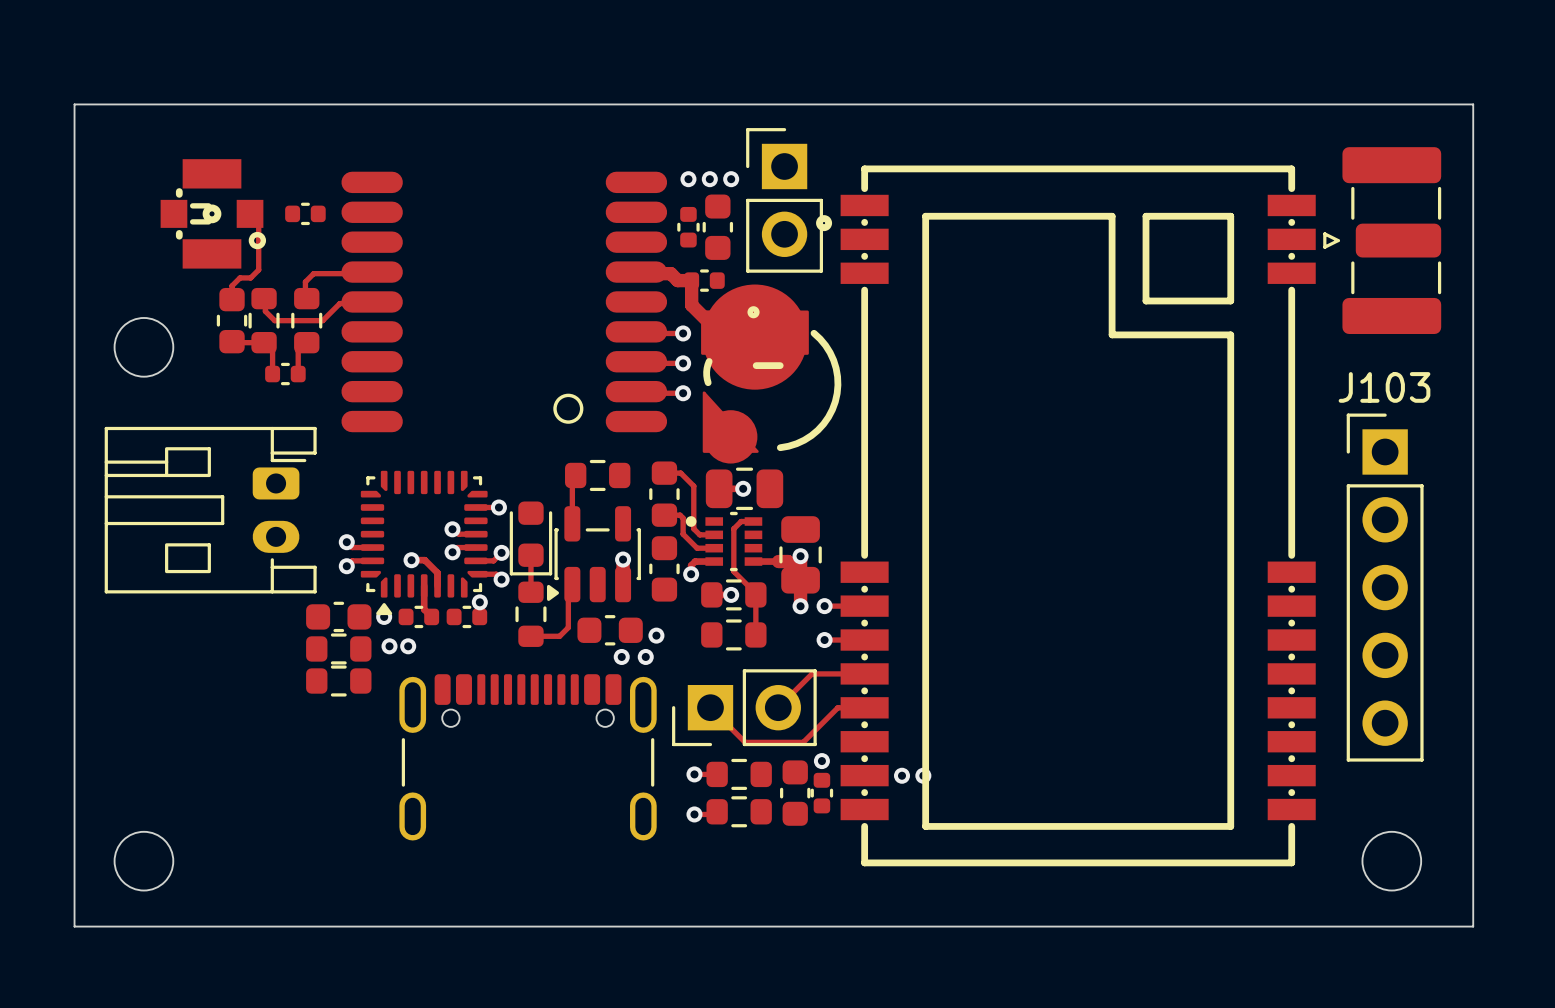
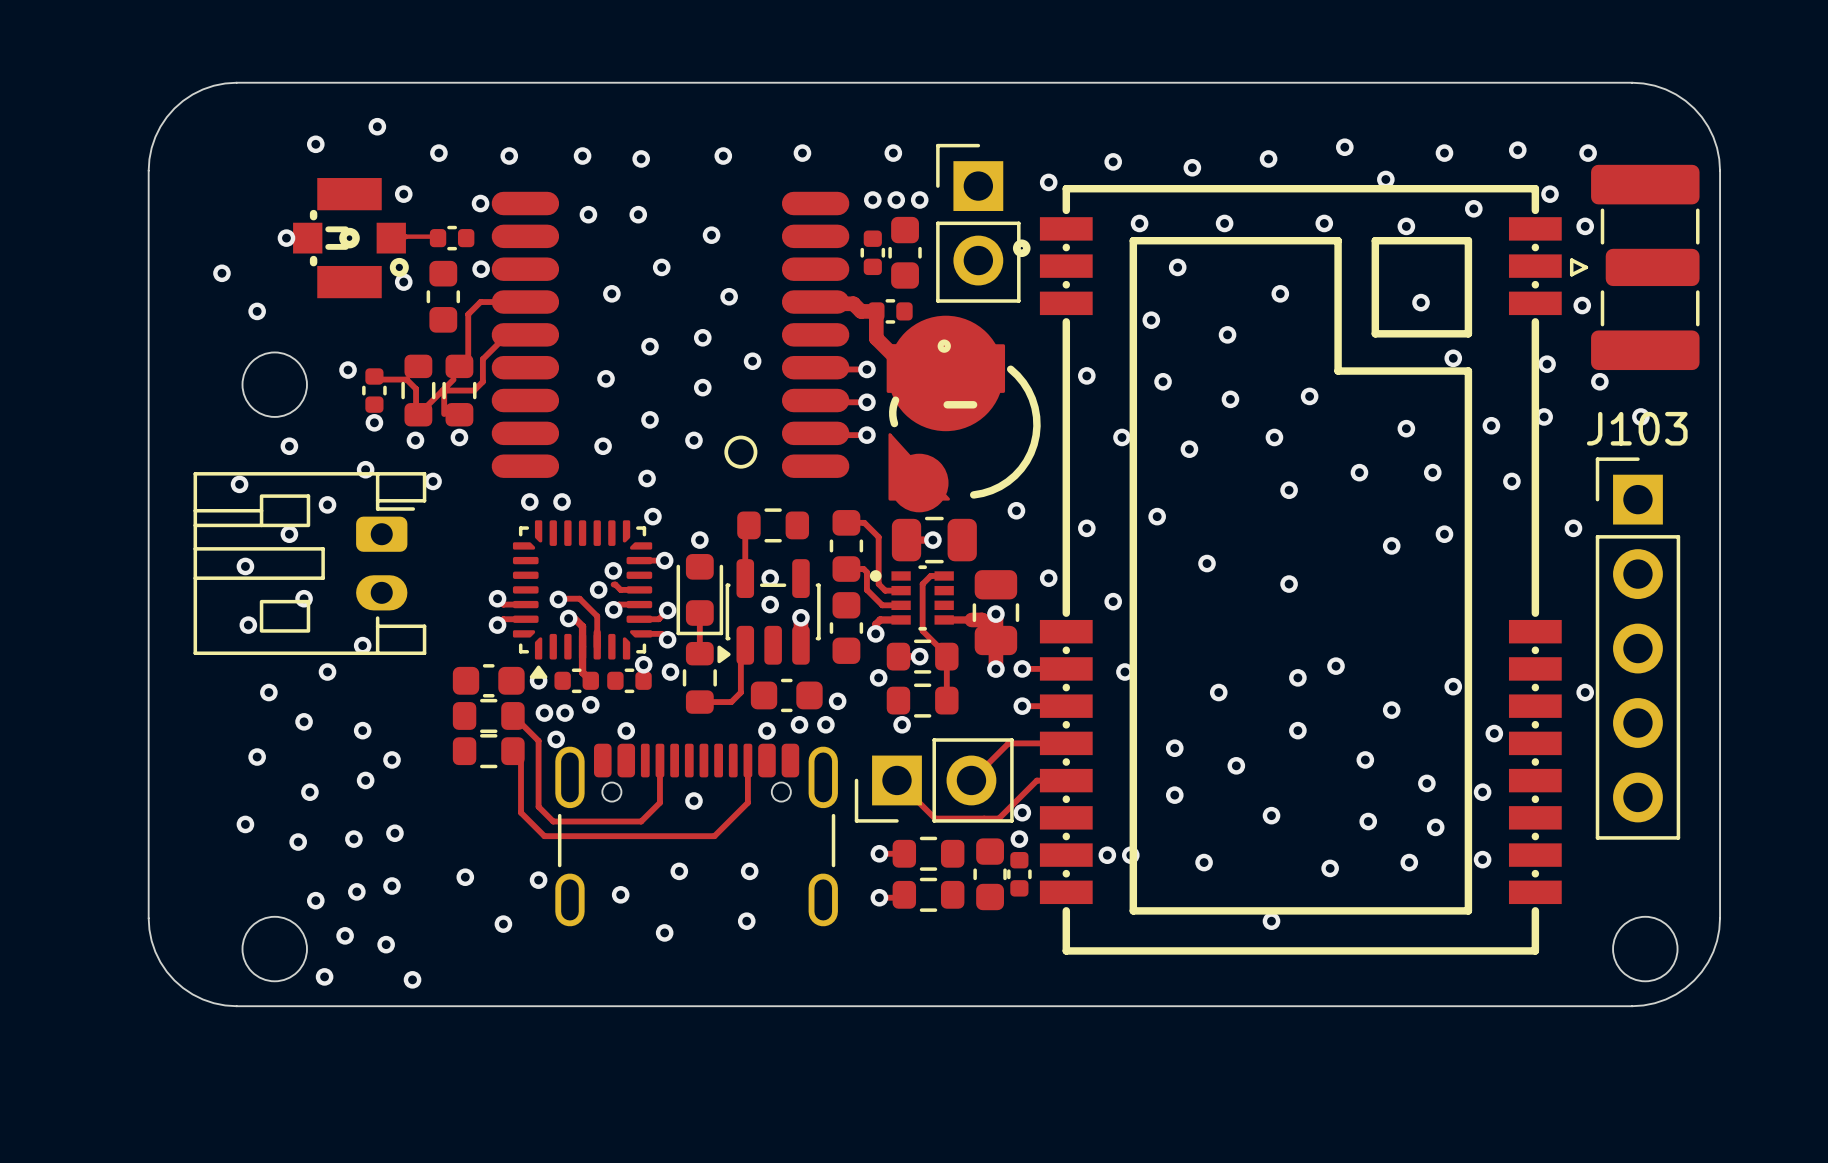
board edge: (74, 104) (1473, 104) (1473, 926) (74, 926) (74, 104) -> (236, 82) (213, 85) (202, 89) (183, 100) (174, 108) (166, 117) (155, 137) (151, 147) (148, 170) (148, 918) (151, 941) (160, 962) (174, 980) (192, 994) (213, 1003) (236, 1006) (1632, 1006) (1654, 1003) (1676, 994) (1694, 980) (1708, 962) (1717, 941) (1720, 918) (1720, 170) (1717, 147) (1708, 126) (1694, 108) (1676, 94) (1654, 85) (1632, 82) (236, 82)
via: none -> (377, 126)
via: none -> (315, 144)
via: none -> (1344, 147)
via: none -> (1517, 150)
via: none -> (438, 153)
via: none -> (802, 153)
via: none -> (893, 153)
via: none -> (1444, 153)
via: none -> (1588, 153)
via: none -> (509, 156)
via: none -> (582, 156)
via: none -> (723, 156)
via: none -> (641, 158)
via: none -> (1268, 158)
via: none -> (1113, 161)
via: none -> (1192, 167)
via: none -> (1385, 179)
via: none -> (1048, 182)
via: none -> (403, 194)
via: none -> (1550, 194)
via: none -> (480, 203)
via: none -> (1473, 208)
via: none -> (588, 214)
via: none -> (638, 214)
via: none -> (1139, 223)
via: none -> (1224, 223)
via: none -> (1324, 223)
via: none -> (1406, 226)
via: none -> (1585, 226)
via: none -> (711, 235)
track: none -> (438, 236) (404, 238)
via: none -> (286, 238)
track: (250, 213) (258, 222) (258, 269) (250, 277) (240, 277) (232, 285) (232, 299) -> none
via: none -> (661, 267)
via: none -> (1177, 267)
via: none -> (481, 269)
via: none -> (221, 273)
via: none -> (403, 282)
via: none -> (611, 293)
via: none -> (1280, 293)
via: none -> (729, 296)
track: none -> (525, 302) (480, 302) (468, 314) (468, 357) (459, 366)
via: none -> (1421, 302)
track: (372, 273) (313, 273) (305, 281) (305, 298) -> none
via: none -> (1582, 305)
via: none -> (257, 311)
via: none -> (1151, 320)
track: (265, 298) (265, 311) (274, 320) (322, 320) (339, 303) (372, 303) -> none
track: none -> (525, 334) (507, 334) (482, 359) (482, 381) (474, 390) (442, 390) (418, 414)
via: none -> (1227, 334)
via: none -> (702, 337)
via: none -> (649, 346)
part position: (232, 320) -> (443, 296)
part: (264, 320) -> none
part: (306, 320) -> none
via: none -> (1453, 358)
via: none -> (752, 361)
via: none -> (1547, 364)
via: none -> (348, 370)
via: none -> (1086, 375)
via: none -> (606, 378)
via: none -> (1163, 381)
via: none -> (1599, 381)
via: none -> (702, 387)
part: none -> (418, 390)
part: none -> (459, 390)
via: none -> (1309, 396)
via: none -> (1230, 399)
part rotation: 0° (285, 374) -> 90° clockwise (374, 390)
part position: (285, 374) -> (374, 390)
via: none -> (1544, 416)
via: none -> (1640, 416)
via: none -> (649, 419)
via: none -> (374, 422)
via: none -> (1491, 425)
via: none -> (1406, 428)
via: none -> (459, 437)
via: none -> (1121, 437)
via: none -> (1274, 437)
via: none -> (415, 440)
via: none -> (693, 440)
via: none -> (289, 446)
via: none -> (603, 446)
via: none -> (1189, 449)
via: none -> (365, 469)
via: none -> (1359, 472)
via: none -> (1432, 472)
via: none -> (647, 478)
via: none -> (433, 481)
via: none -> (1511, 481)
via: none -> (239, 484)
via: none -> (1289, 490)
via: none -> (529, 501)
via: none -> (562, 501)
via: none -> (327, 504)
via: none -> (1016, 510)
via: none -> (652, 516)
via: none -> (1157, 516)
via: none -> (1086, 528)
via: none -> (1573, 528)
via: none -> (289, 534)
via: none -> (1444, 534)
via: none -> (699, 540)
via: none -> (1391, 545)
part position: (210, 510) -> (309, 563)
via: none -> (1207, 563)
via: none -> (245, 566)
via: none -> (613, 570)
via: none -> (770, 578)
via: none -> (1048, 578)
via: none -> (1289, 584)
via: (452, 529) -> none
via: none -> (598, 589)
via: none -> (304, 598)
via: none -> (558, 599)
via: none -> (1113, 601)
via: none -> (770, 604)
track: none -> (573, 617) (582, 626) (582, 646)
track: (411, 560) (424, 560) (437, 572) -> (558, 599) (579, 598) (597, 616) (597, 632)
via: none -> (248, 625)
via: none -> (362, 645)
via: none -> (1336, 666)
via: none -> (327, 672)
via: none -> (670, 672)
via: none -> (1124, 672)
via: none -> (878, 677)
via: none -> (1297, 677)
via: none -> (1453, 686)
via: none -> (268, 692)
via: none -> (1218, 692)
via: none -> (1585, 692)
via: none -> (590, 704)
via: none -> (1391, 710)
track: none -> (512, 715) (538, 740) (538, 806) (553, 821) (641, 821) (659, 802) (659, 760)
via: none -> (304, 721)
via: none -> (902, 724)
via: none -> (362, 730)
via: none -> (626, 730)
via: none -> (766, 730)
via: none -> (1297, 730)
via: none -> (1494, 733)
via: none -> (556, 739)
via: none -> (1174, 748)
track: none -> (512, 751) (521, 759) (521, 812) (544, 836) (714, 836) (747, 802) (747, 760)
via: none -> (257, 757)
via: none -> (392, 759)
via: none -> (1365, 759)
via: none -> (1236, 765)
via: none -> (365, 780)
via: none -> (1426, 783)
via: none -> (309, 792)
via: none -> (1482, 792)
via: none -> (1174, 795)
via: none -> (693, 800)
via: none -> (1022, 812)
via: none -> (1271, 815)
via: none -> (1368, 821)
via: none -> (245, 824)
via: none -> (1435, 827)
via: none -> (394, 833)
via: none -> (353, 839)
via: none -> (298, 842)
via: none -> (1482, 859)
via: none -> (1204, 862)
via: none -> (1409, 862)
via: none -> (1330, 868)
via: none -> (679, 871)
via: none -> (749, 871)
via: none -> (465, 877)
via: none -> (538, 880)
via: none -> (392, 886)
via: none -> (356, 891)
via: none -> (620, 894)
via: none -> (315, 900)
via: none -> (746, 921)
via: none -> (1271, 921)
via: none -> (503, 924)
via: none -> (664, 932)
via: none -> (345, 935)
via: none -> (386, 944)
via: none -> (324, 976)
via: none -> (412, 979)

